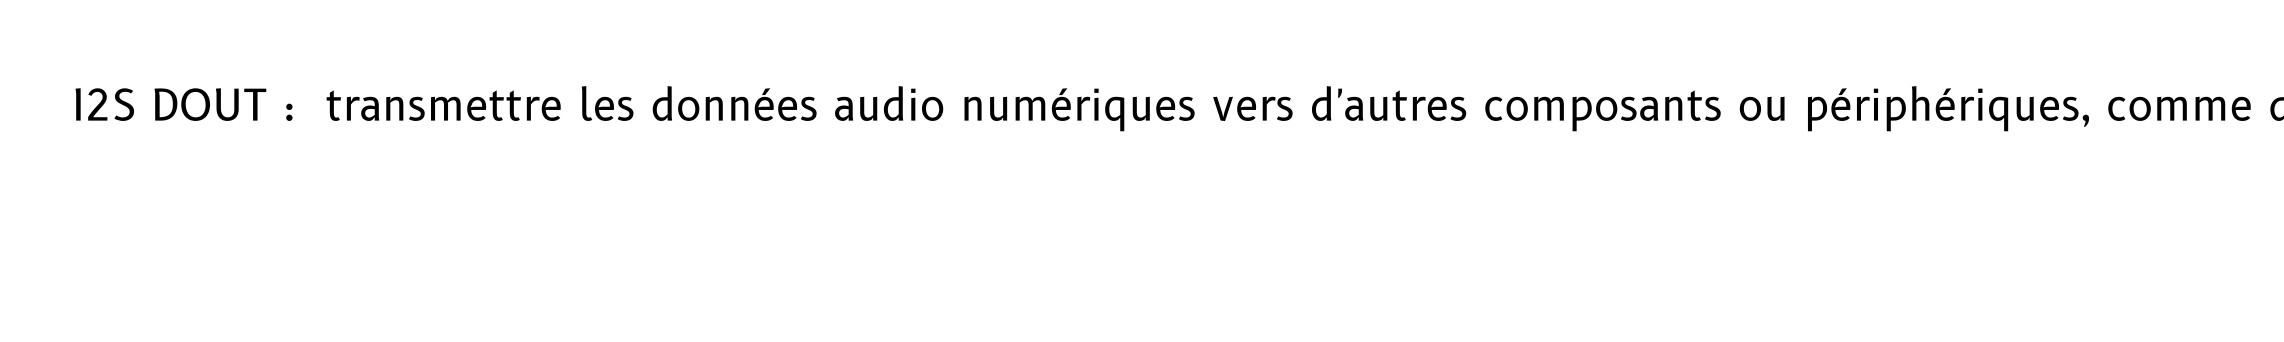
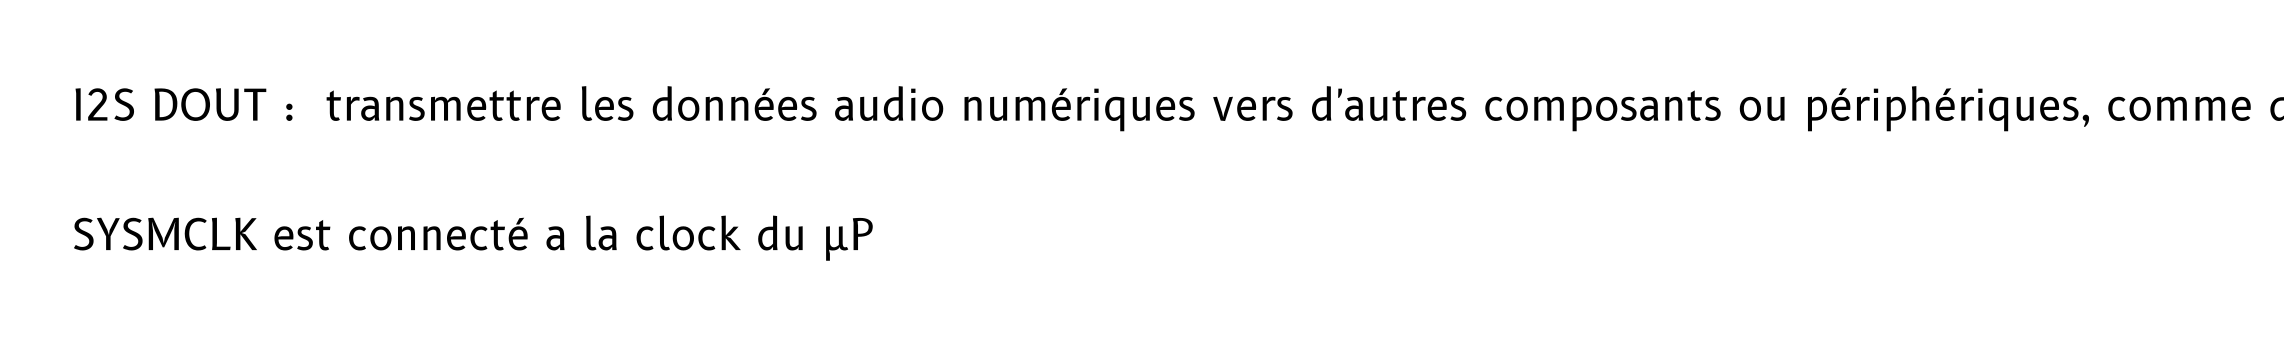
text: none -> SYSMCLK est connecté a la clock du µP (473, 238)

